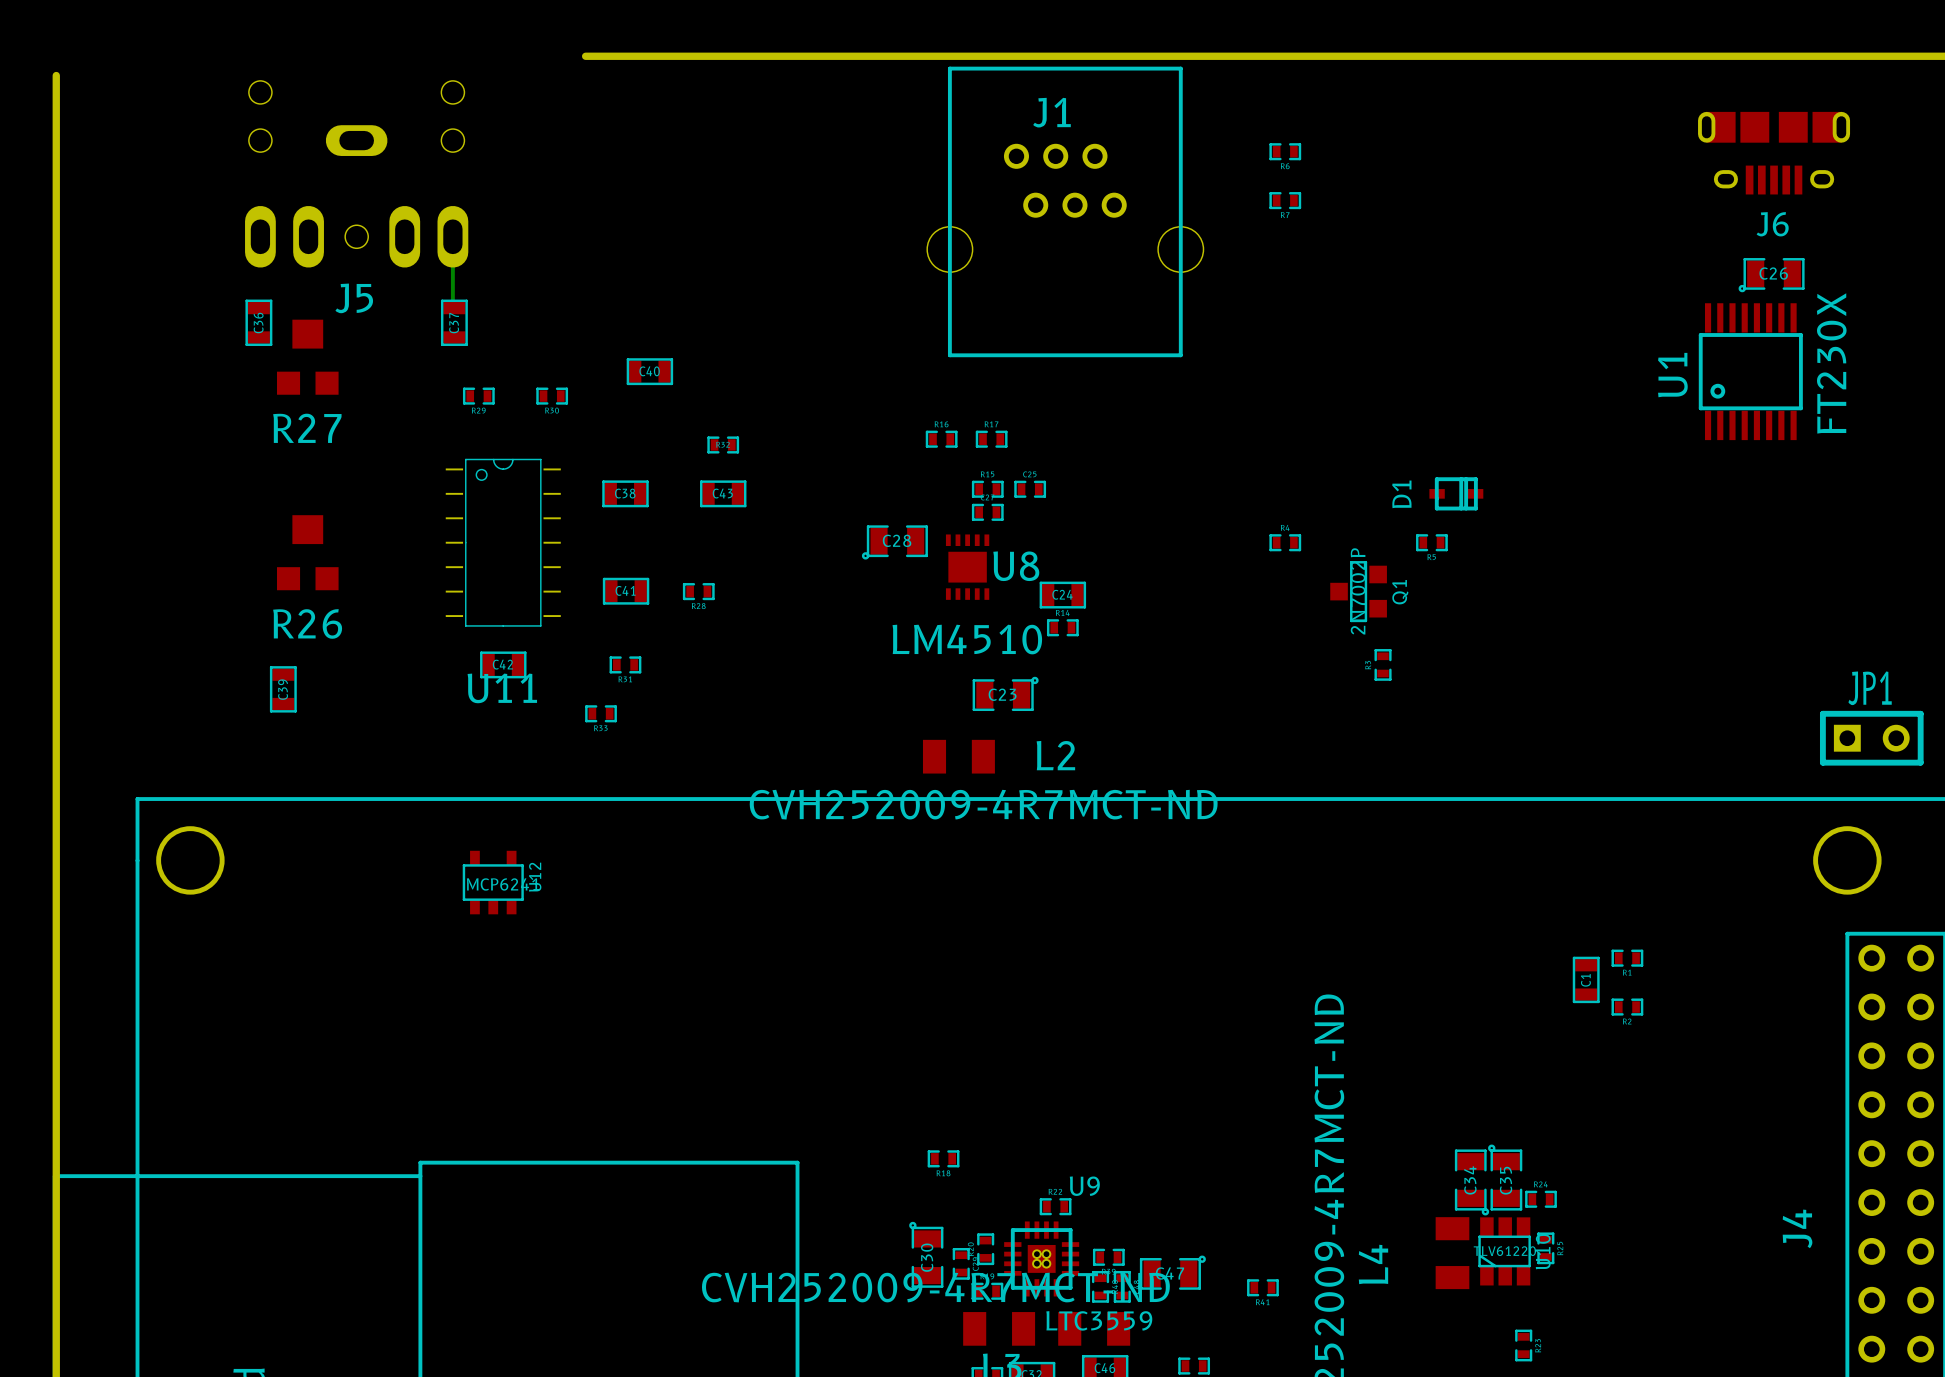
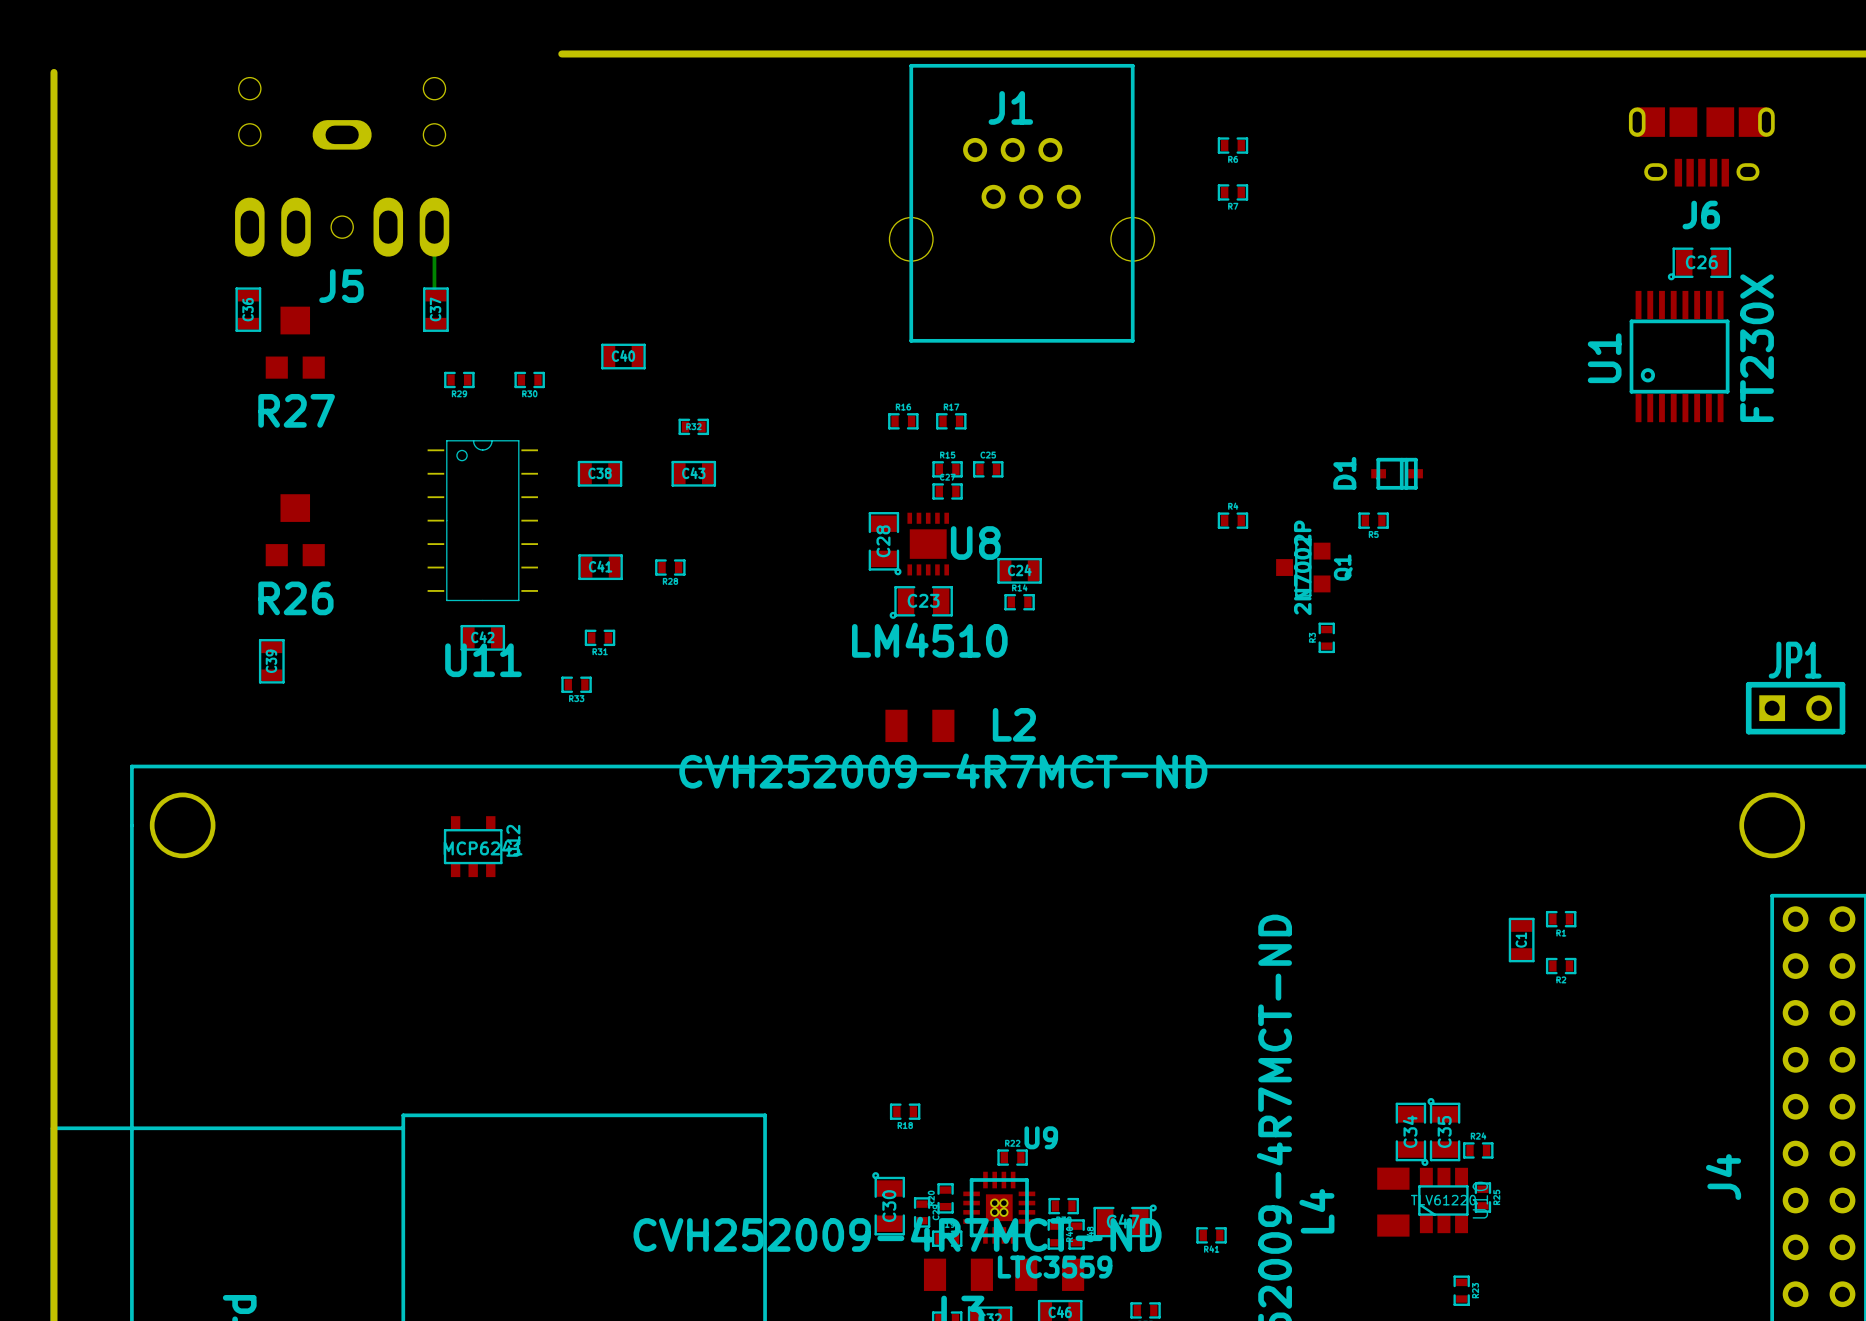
C28 rotation: 0° (894, 542) -> 90° counterclockwise (885, 543)
U8 value position: LM4510 (967, 639) -> LM4510 (929, 640)
C23 rotation: 0° (1005, 693) -> 180° (921, 602)
C23 position: (1005, 693) -> (921, 602)

